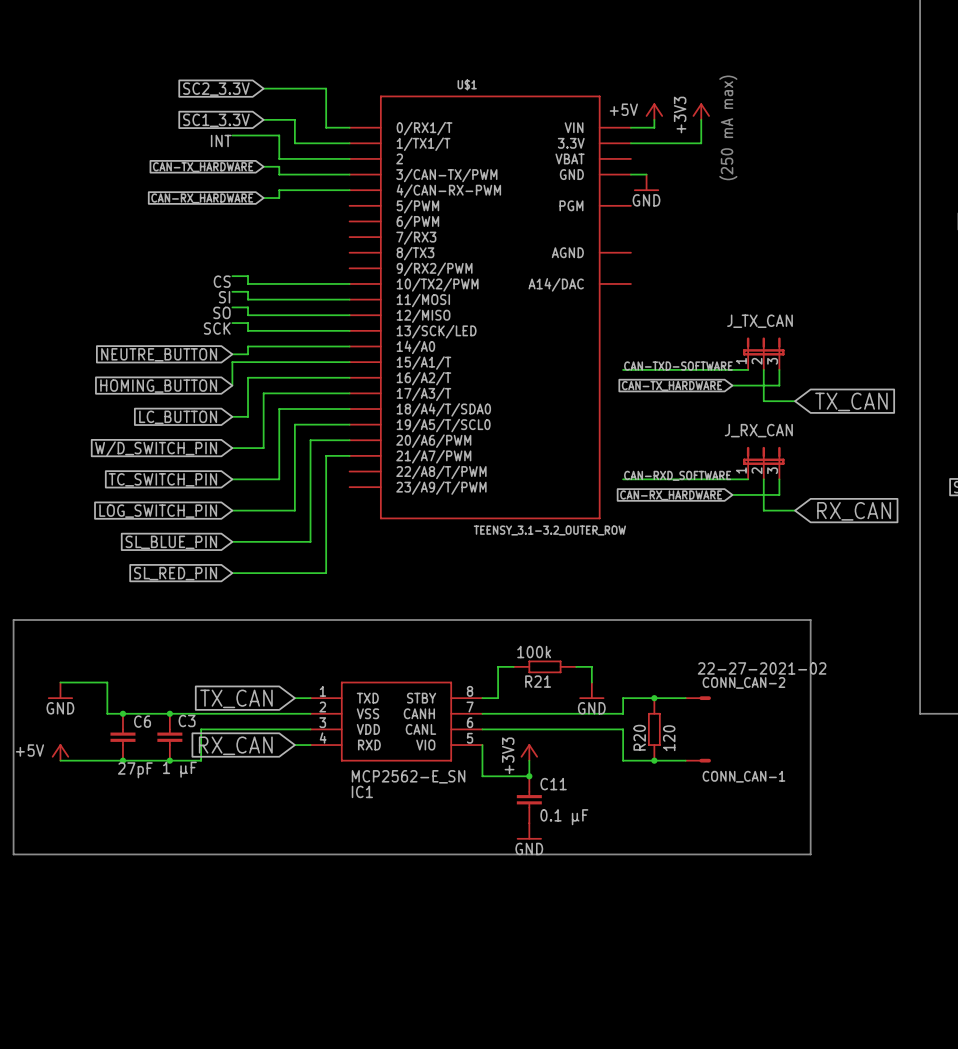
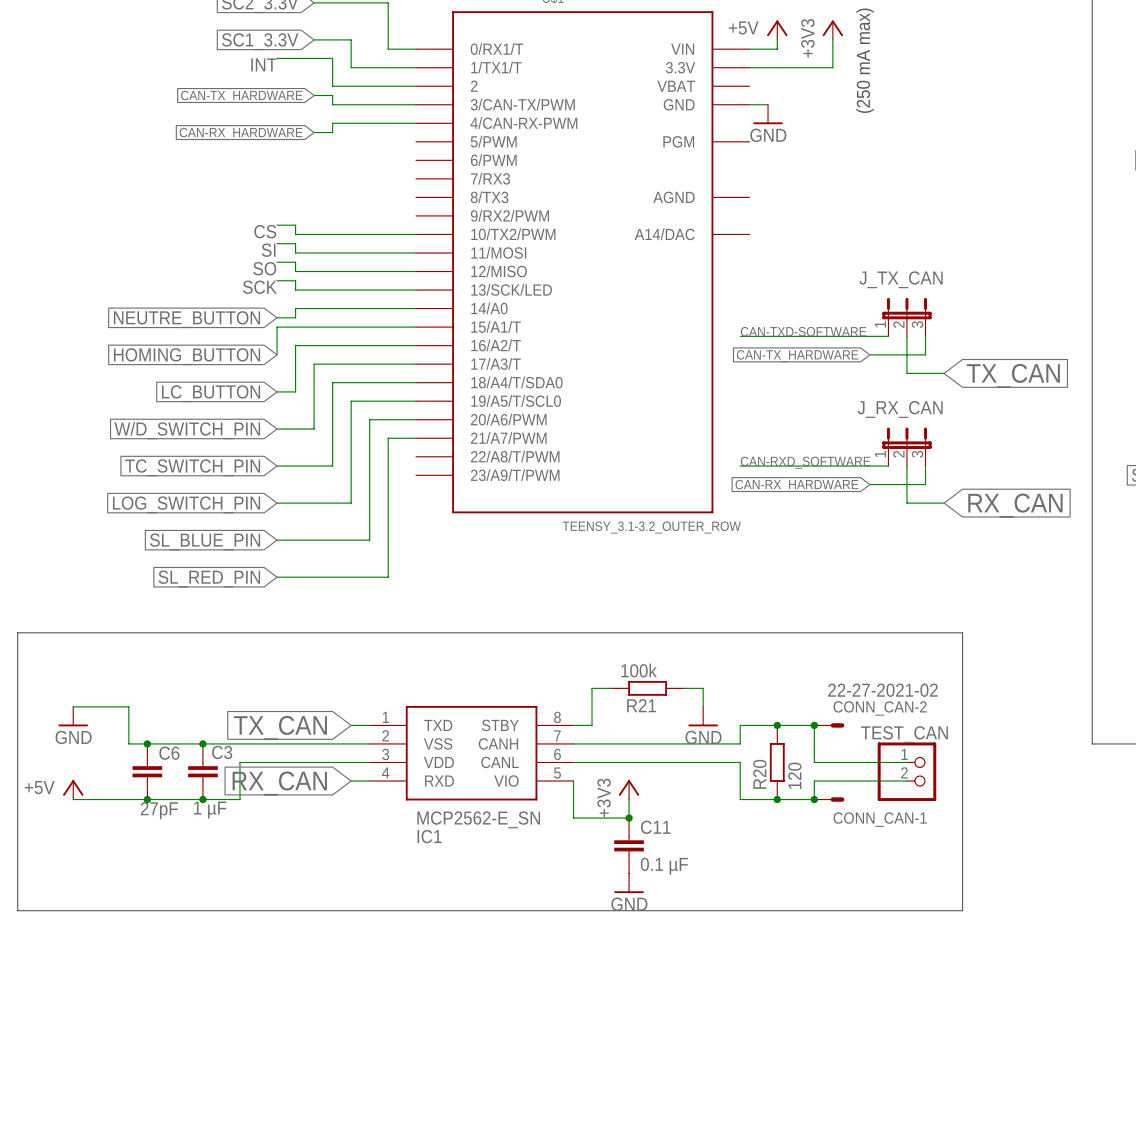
wire: none -> (814, 725) (814, 762) (906, 762)
junction: none -> (814, 725)
TEST_CAN: none -> (906, 771)
wire: none -> (906, 781) (814, 781) (814, 799)
junction: none -> (814, 799)

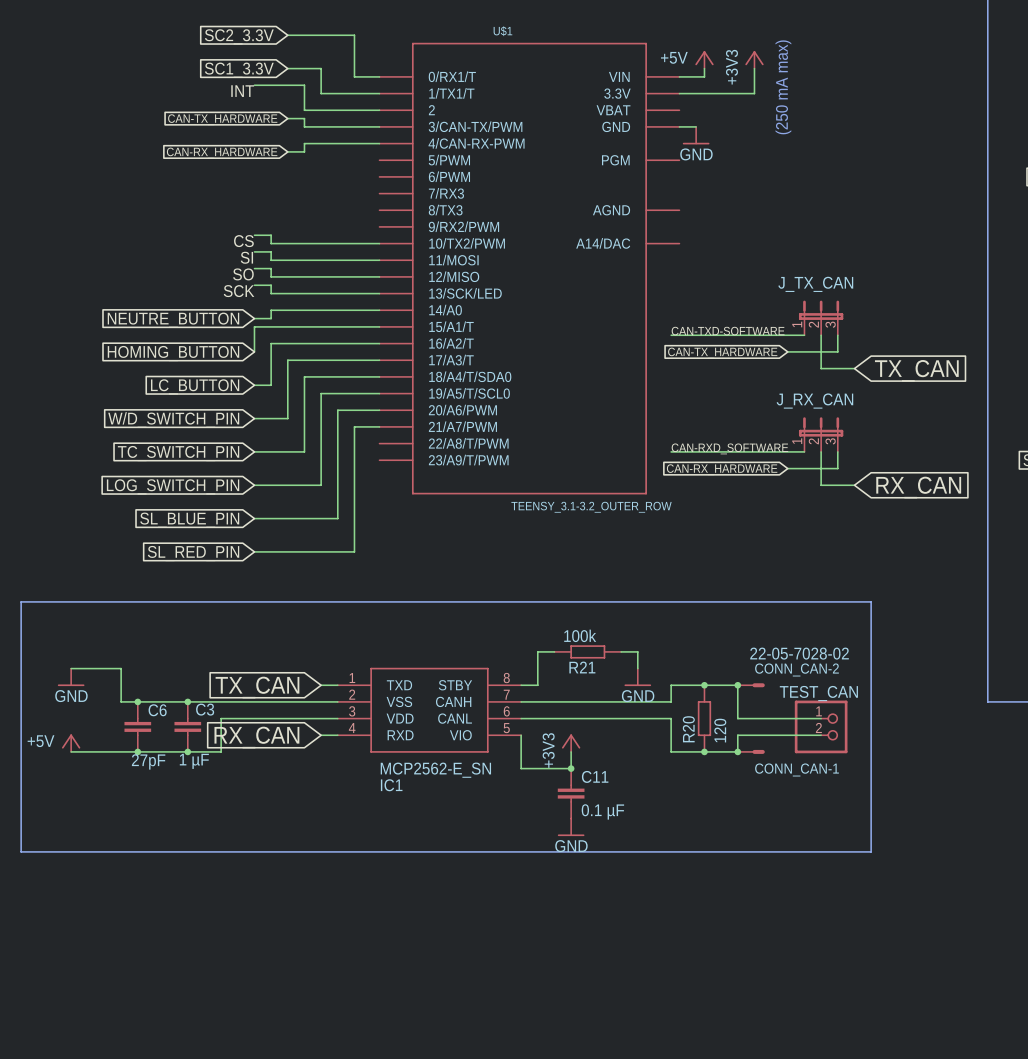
CONN_CAN-1 value: 22-27-2021-02 (882, 690) -> 22-05-7028-02 (799, 653)

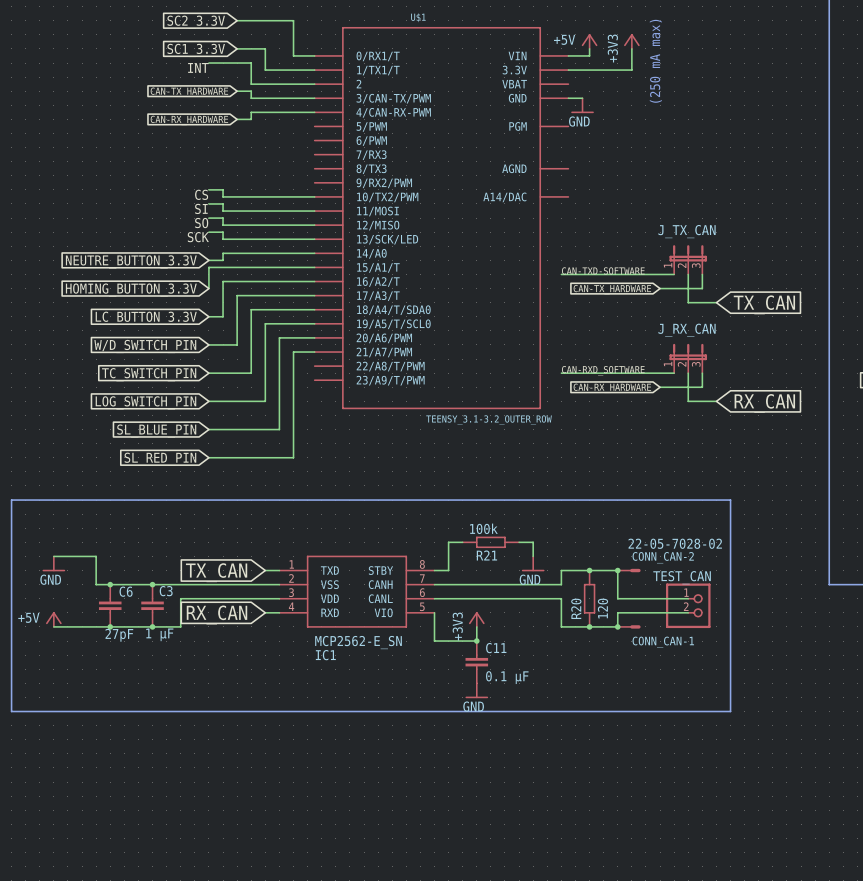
global label: NEUTRE_BUTTON (173, 320) -> NEUTRE_BUTTON_3.3V (131, 261)
global label: HOMING_BUTTON (173, 353) -> HOMING_BUTTON_3.3V (131, 290)
global label: LC_BUTTON (195, 386) -> LC_BUTTON_3.3V (146, 318)

